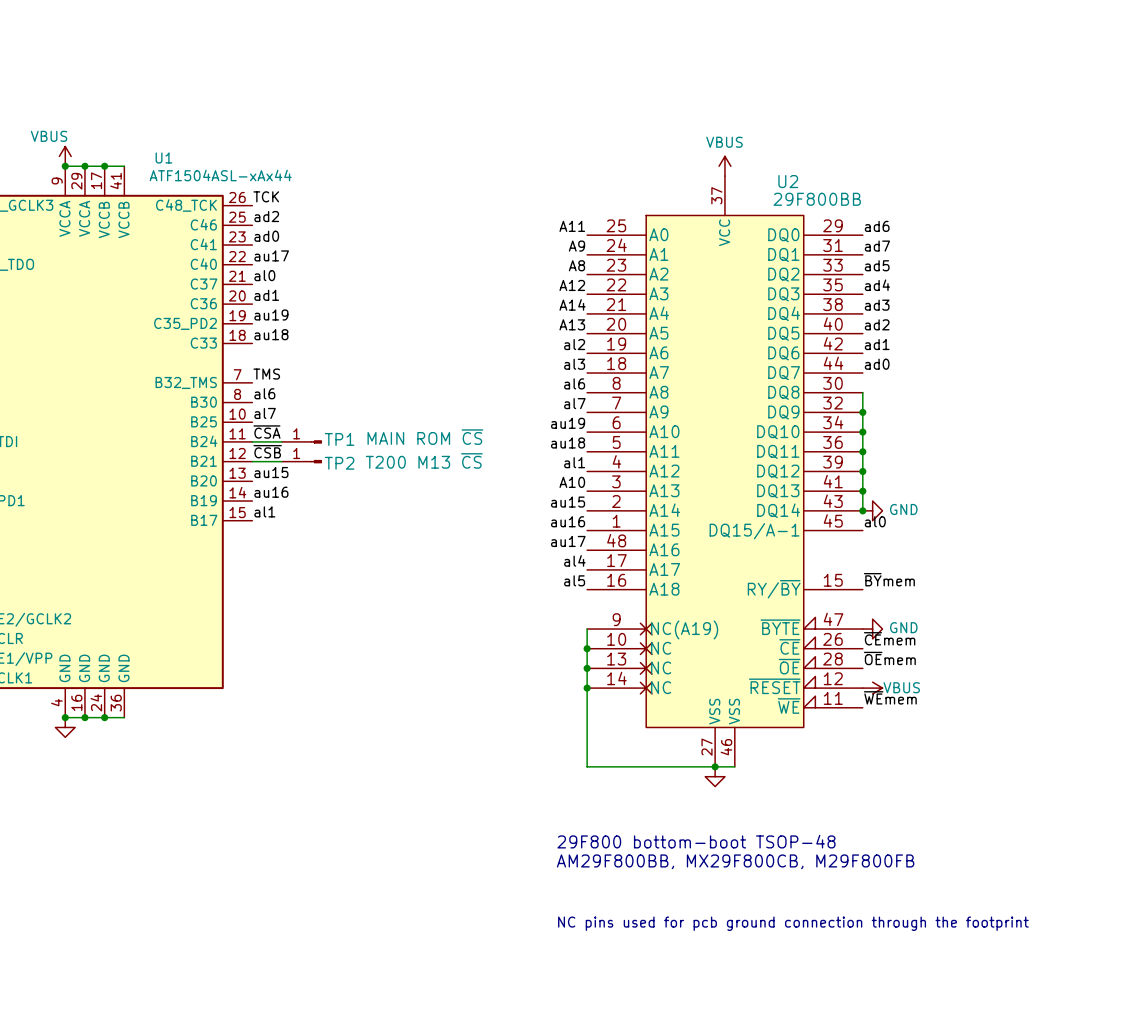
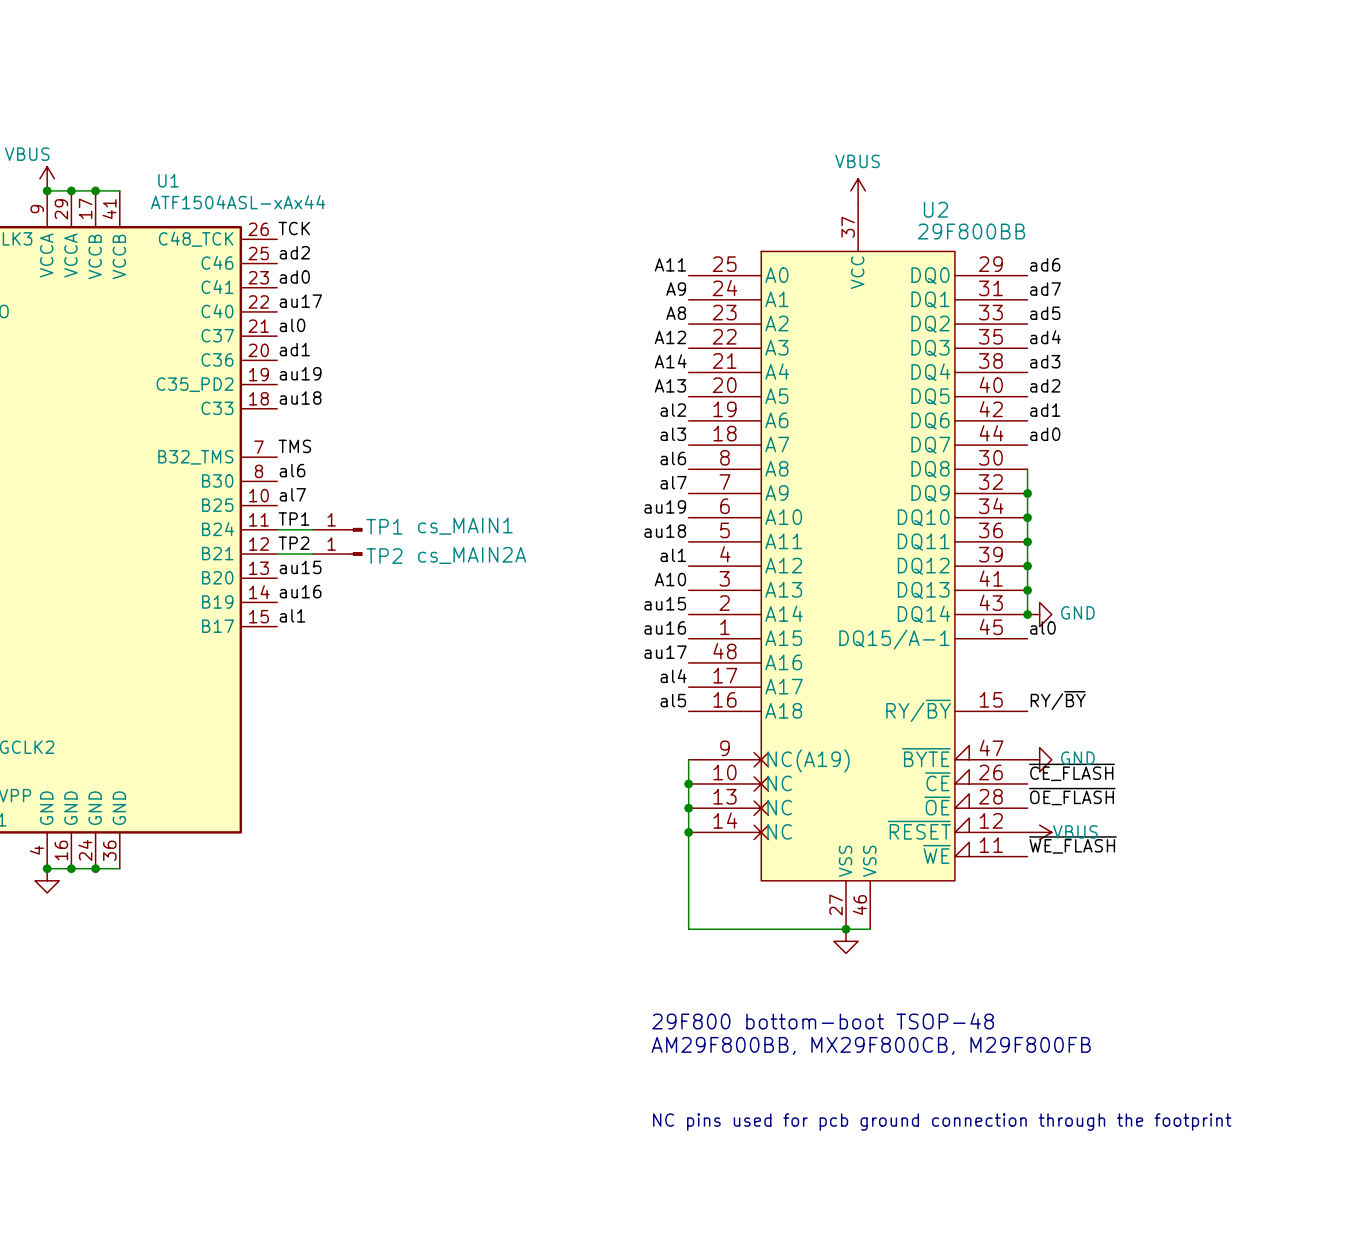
label: ~{CSA} (266, 432) -> TP1 (293, 519)
TP1 value: MAIN ROM ~{CS} (425, 437) -> cs_MAIN1 (465, 526)
label: ~{CSB} (267, 451) -> TP2 (293, 543)
TP2 value: T200 M13 ~{CS} (424, 460) -> cs_MAIN2A (472, 555)
label: ~{BY}mem (889, 579) -> RY/~{BY} (1058, 700)
label: ~{CE}mem (889, 638) -> ~{CE_FLASH} (1072, 772)
label: ~{OE}mem (889, 658) -> ~{OE_FLASH} (1072, 796)
label: ~{WE}mem (890, 697) -> ~{WE_FLASH} (1072, 844)

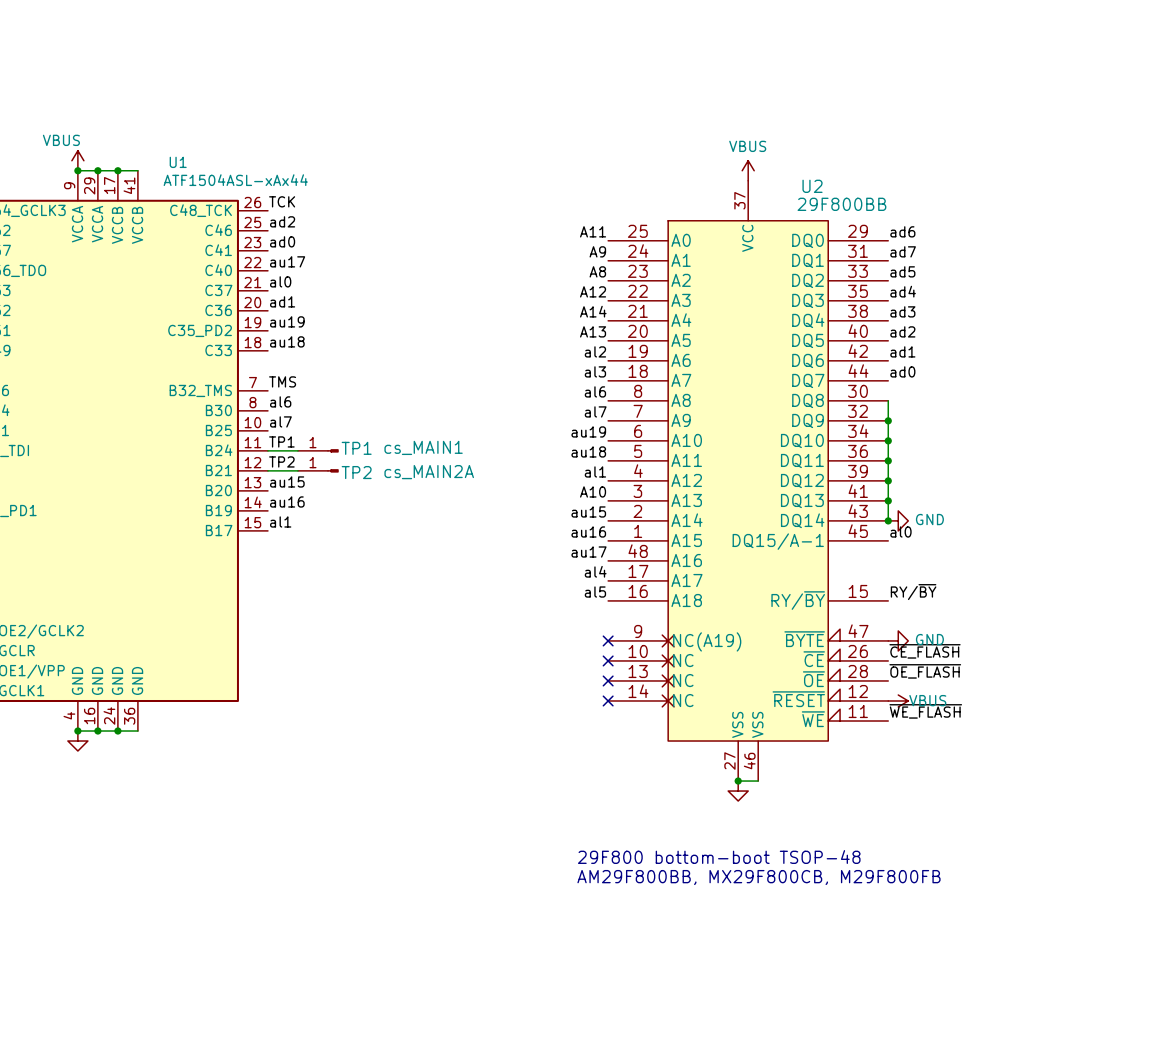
wire: (688, 759) (688, 929) (846, 929) -> none
no-connect mark: none -> (608, 640)
junction: (688, 783) -> none
no-connect mark: none -> (608, 660)
junction: (688, 808) -> none
no-connect mark: none -> (608, 680)
junction: (688, 832) -> none
no-connect mark: none -> (608, 700)
text: NC pins used for pcb ground connection through the footprint (942, 1122) -> none

